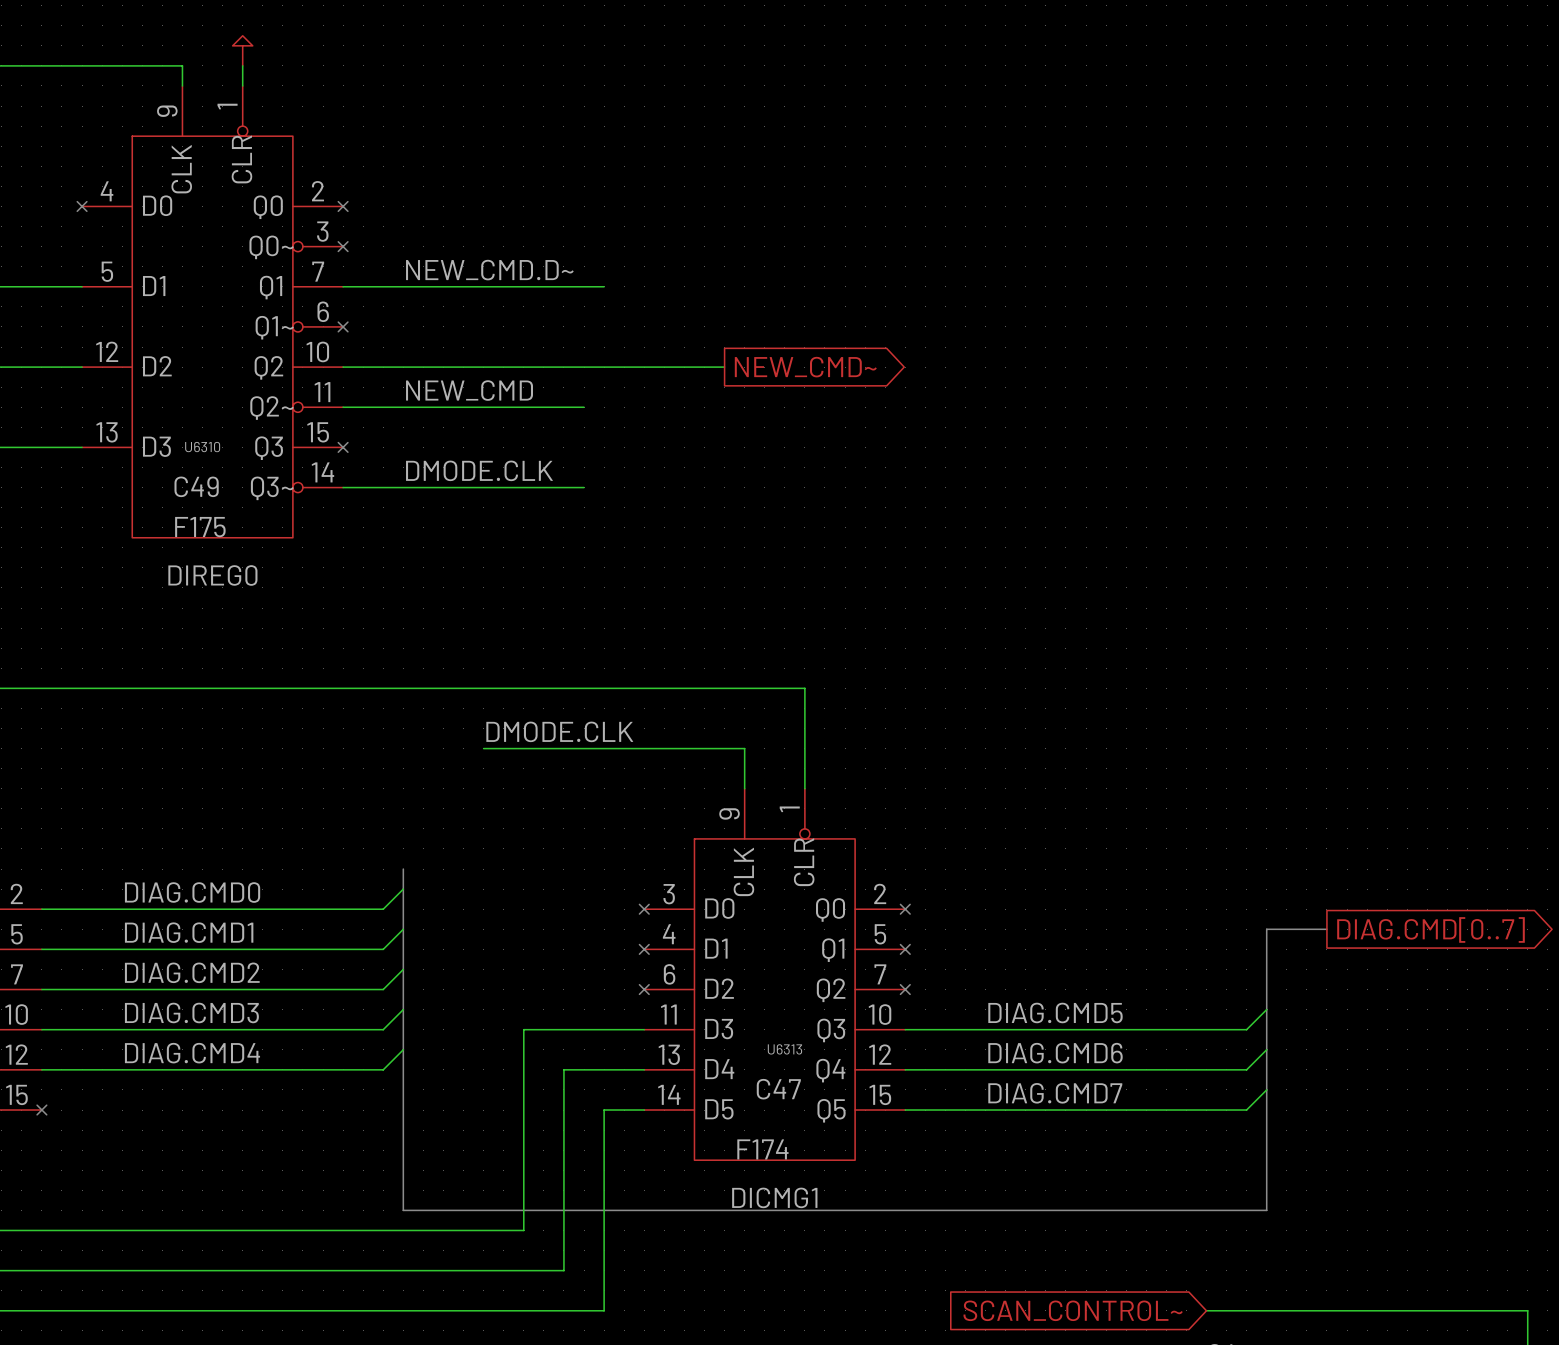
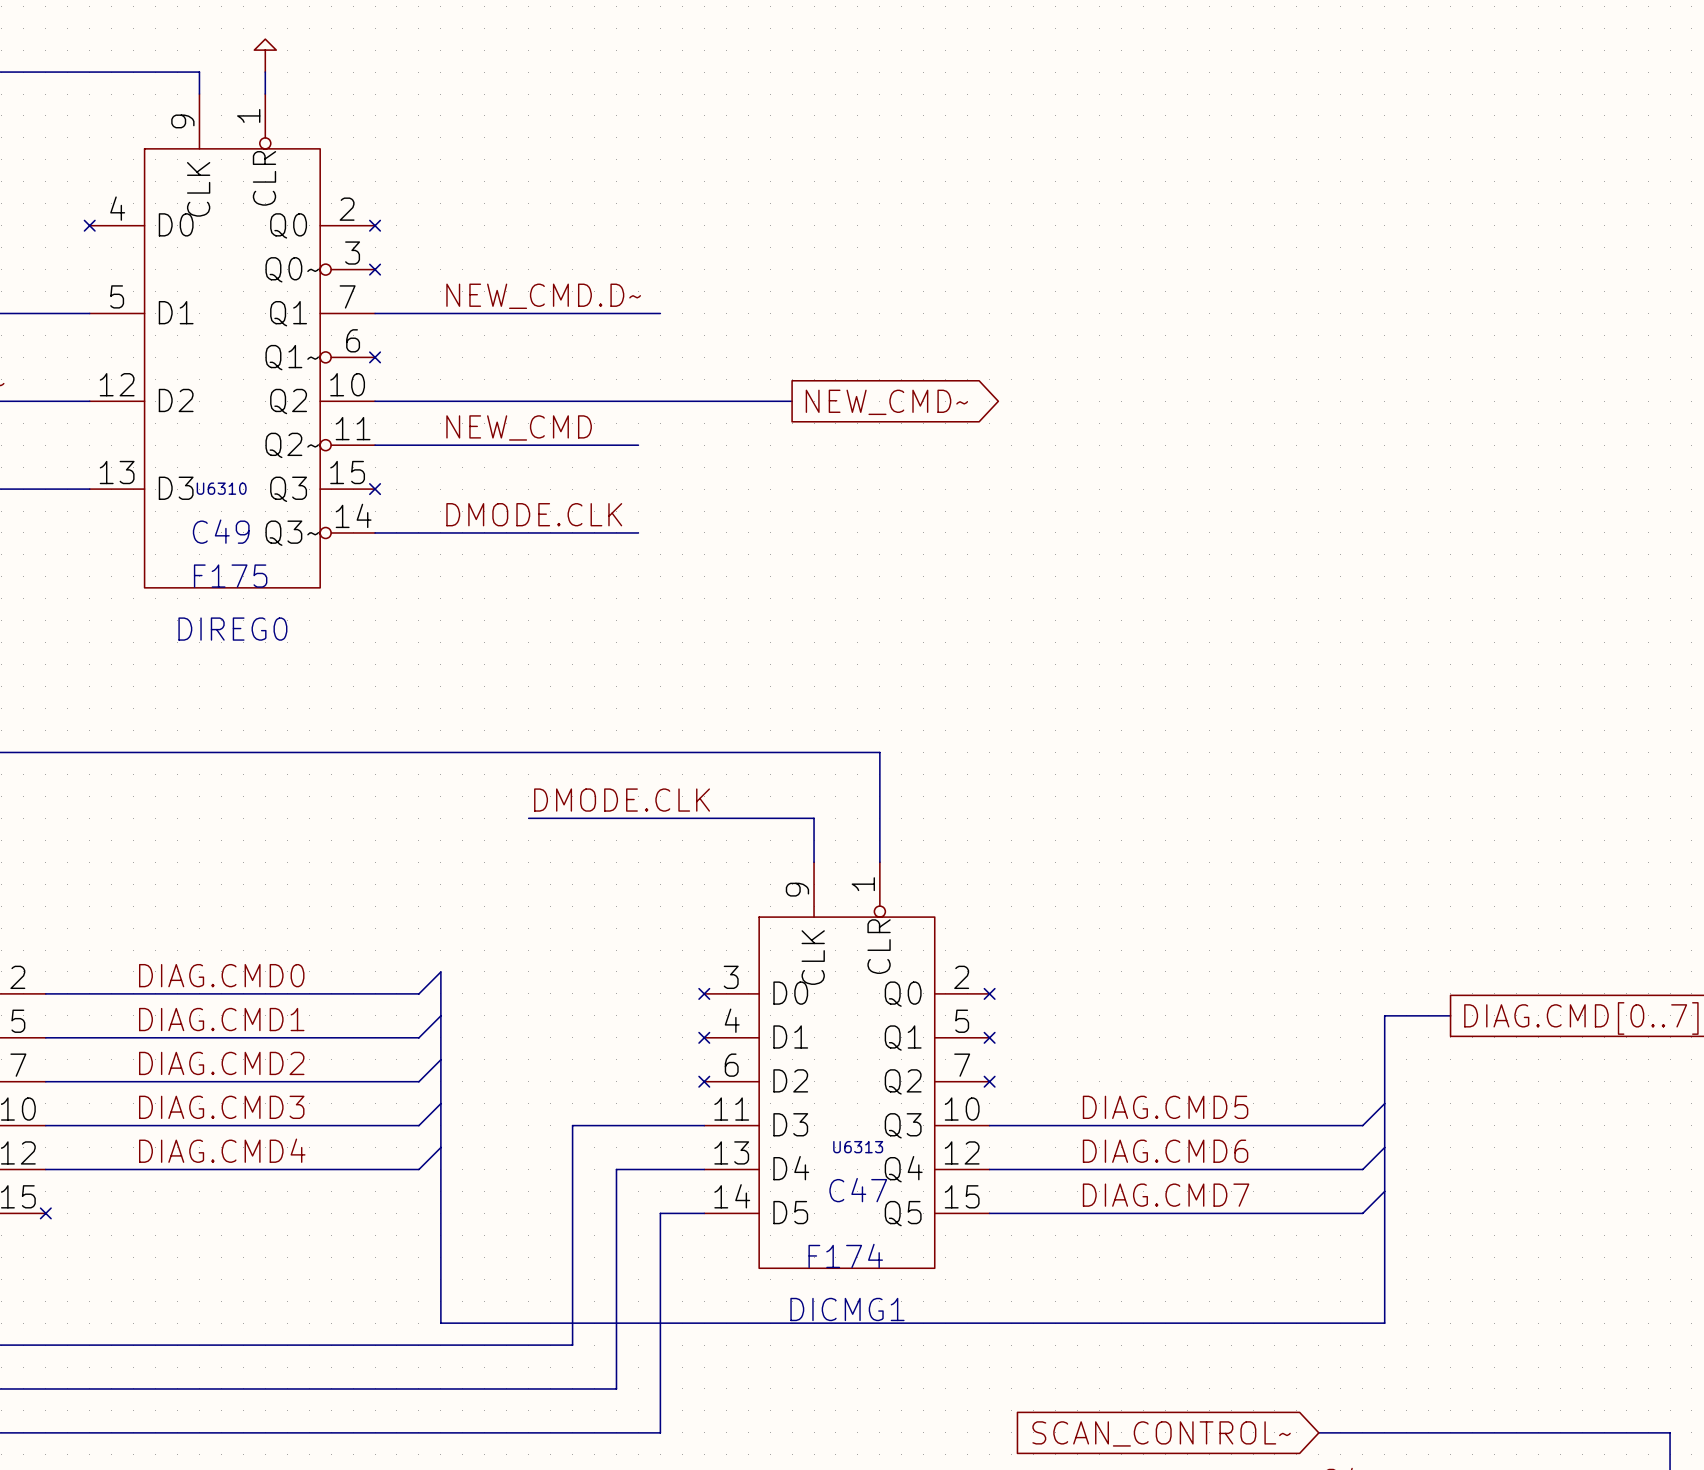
bus: (403, 869) (403, 889) -> none

